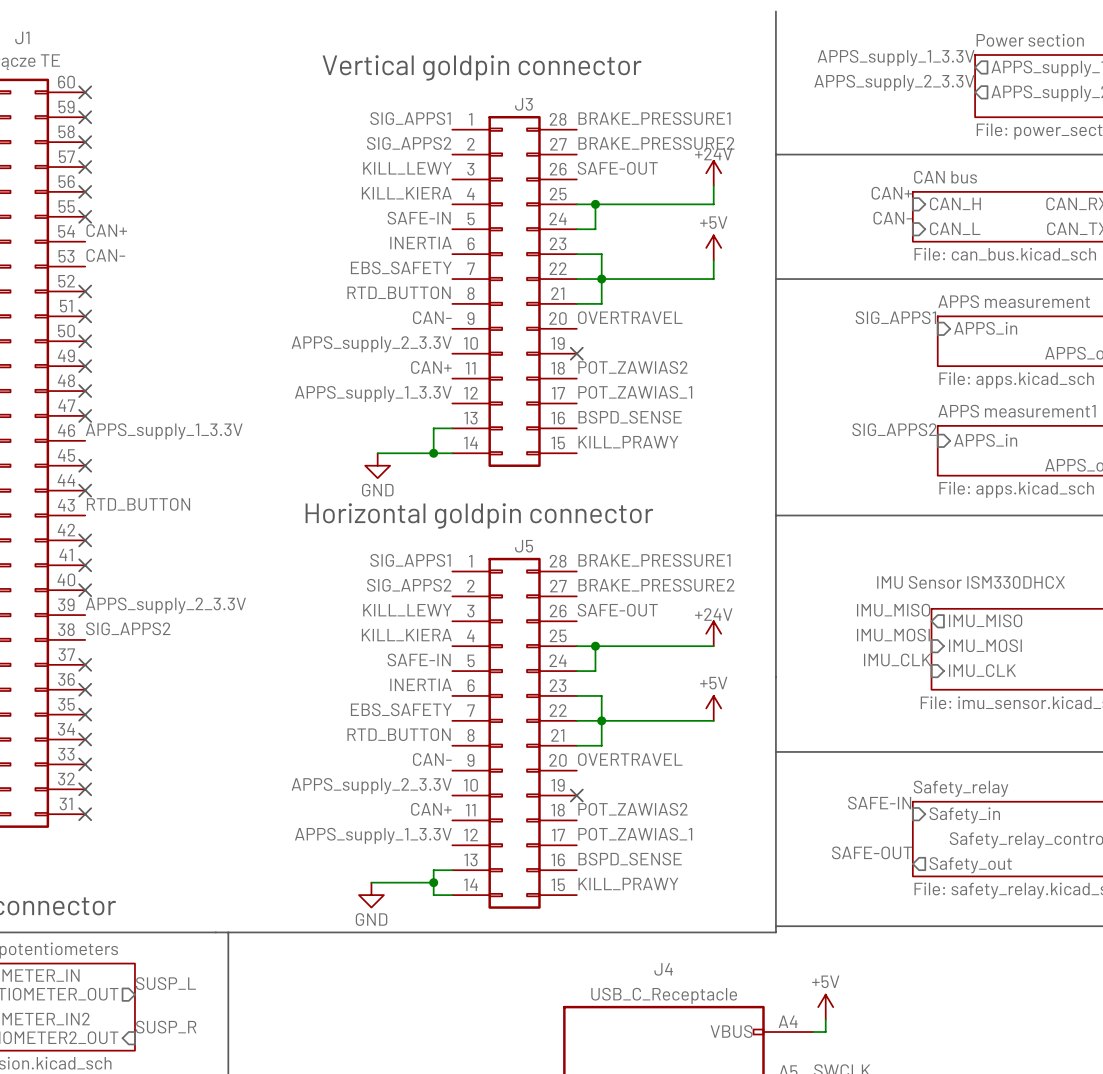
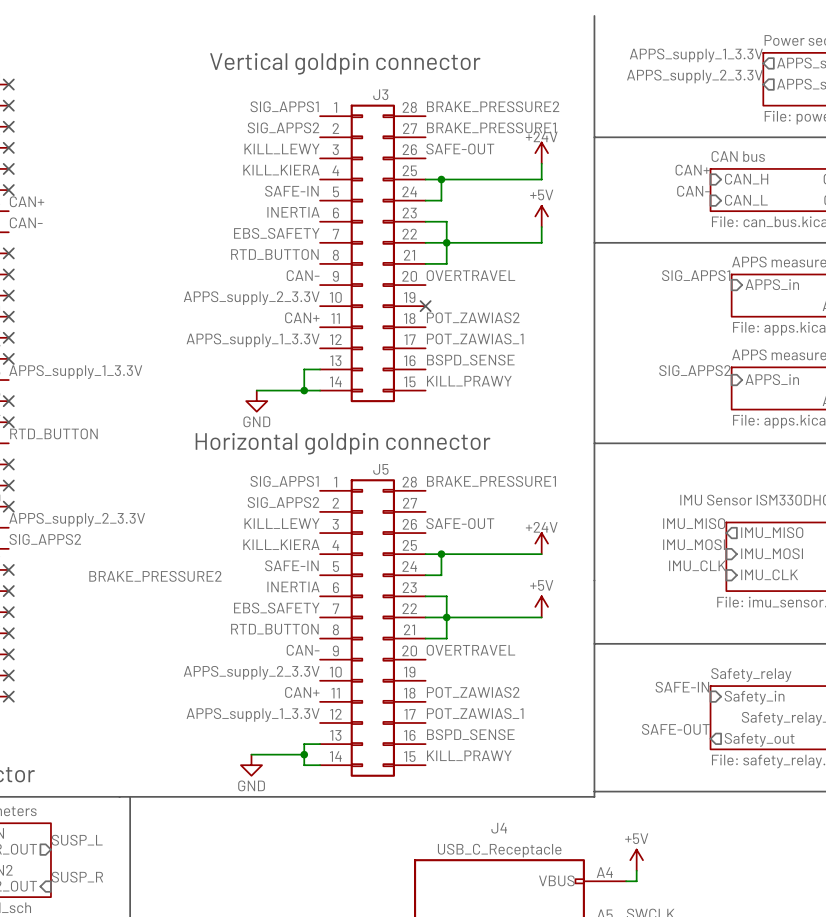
label: BRAKE_PRESSURE1 (654, 118) -> BRAKE_PRESSURE2 (493, 106)
label: BRAKE_PRESSURE2 (656, 143) -> BRAKE_PRESSURE1 (491, 127)
label: BRAKE_PRESSURE2 (656, 585) -> none
label: none -> BRAKE_PRESSURE2 (155, 576)
no-connect mark: (576, 795) -> none

